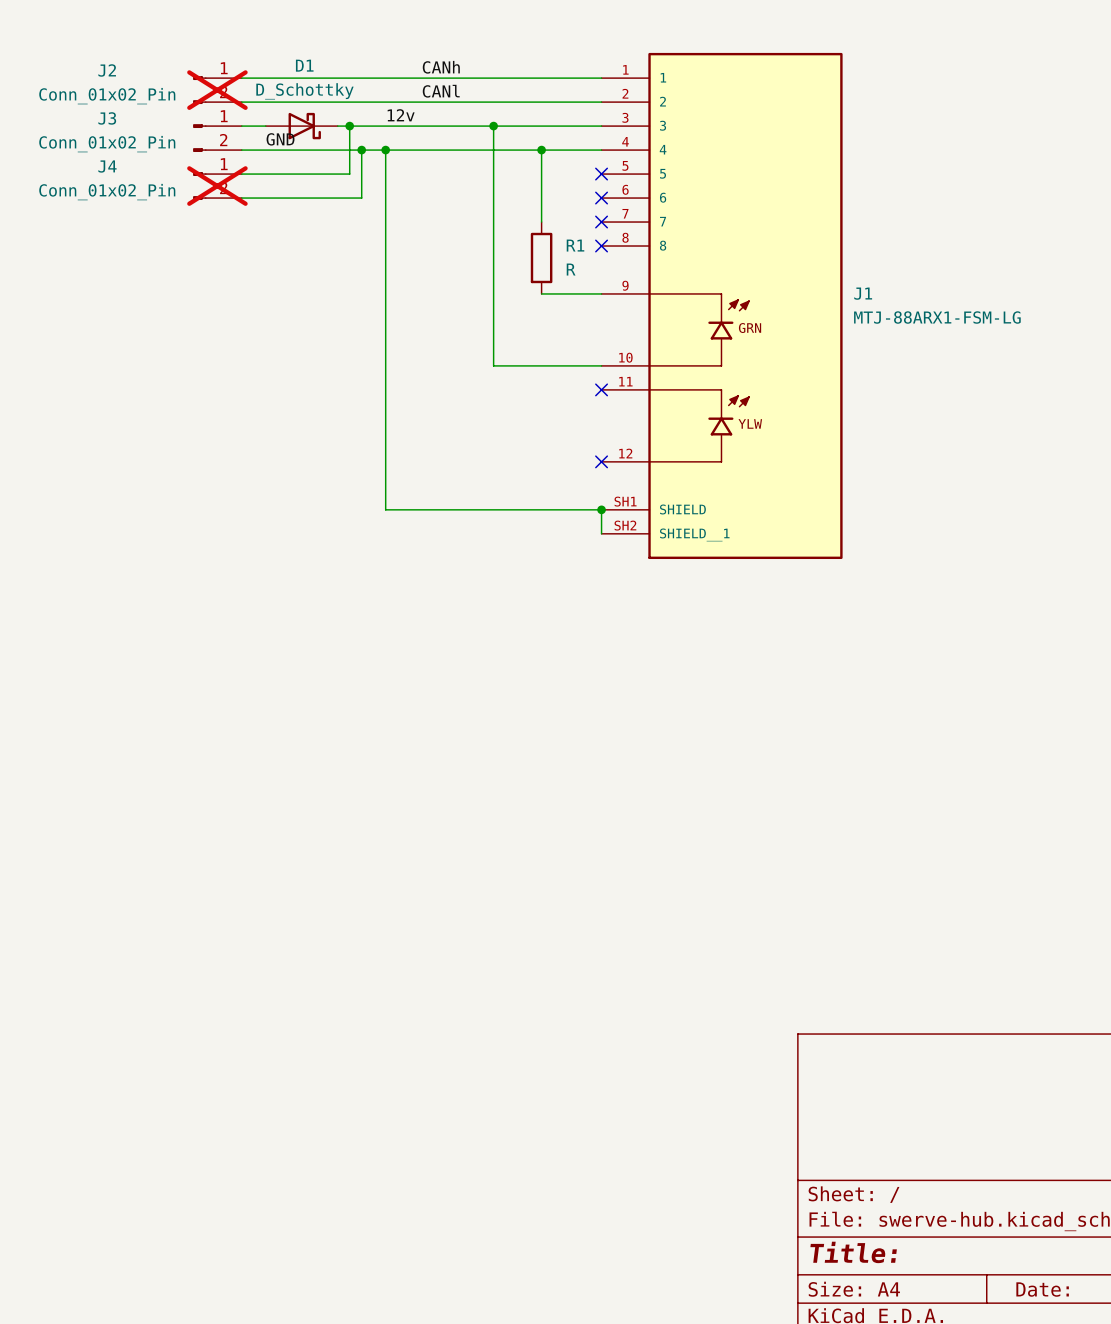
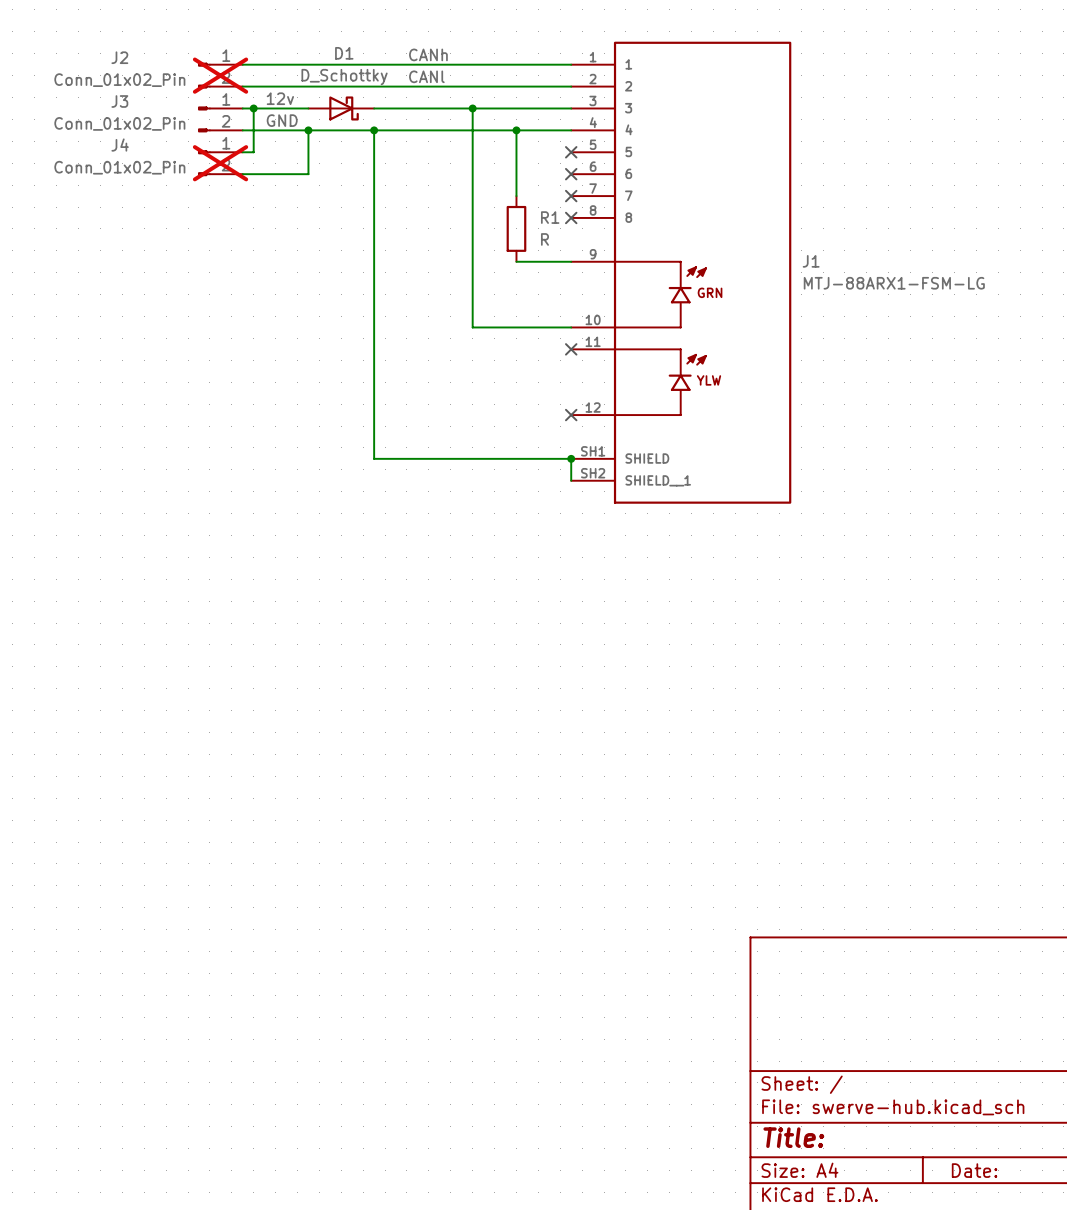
label position: 12v (401, 115) -> 12v (280, 98)
junction: none -> (253, 108)
D1 position: (301, 126) -> (341, 108)
wire: (349, 126) (349, 174) (253, 174) -> (253, 108) (253, 152)
junction: (349, 126) -> none
junction: none -> (308, 130)
wire: (361, 150) (361, 198) (313, 198) -> (308, 130) (308, 174)
junction: (361, 150) -> none

